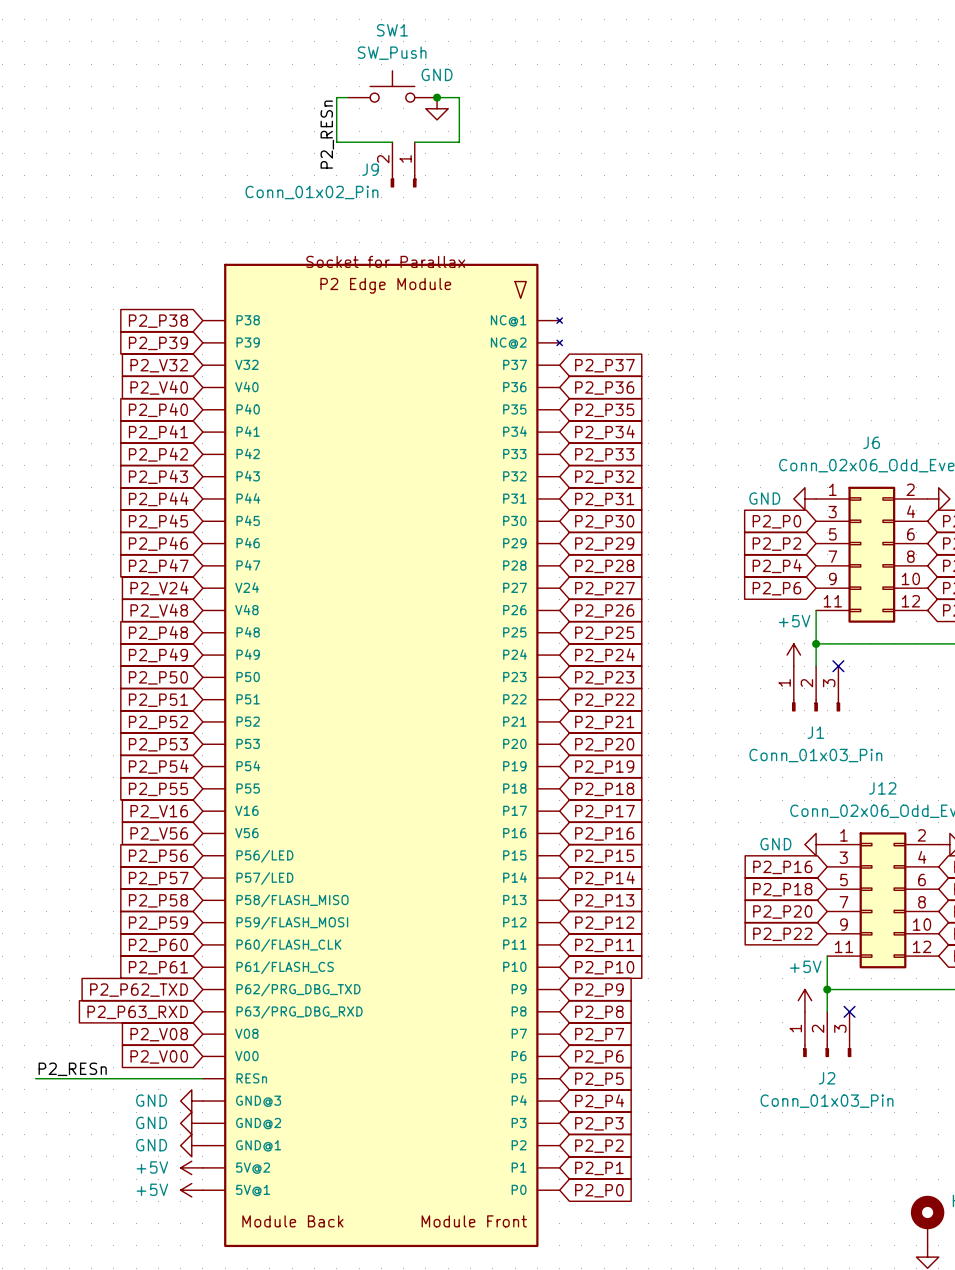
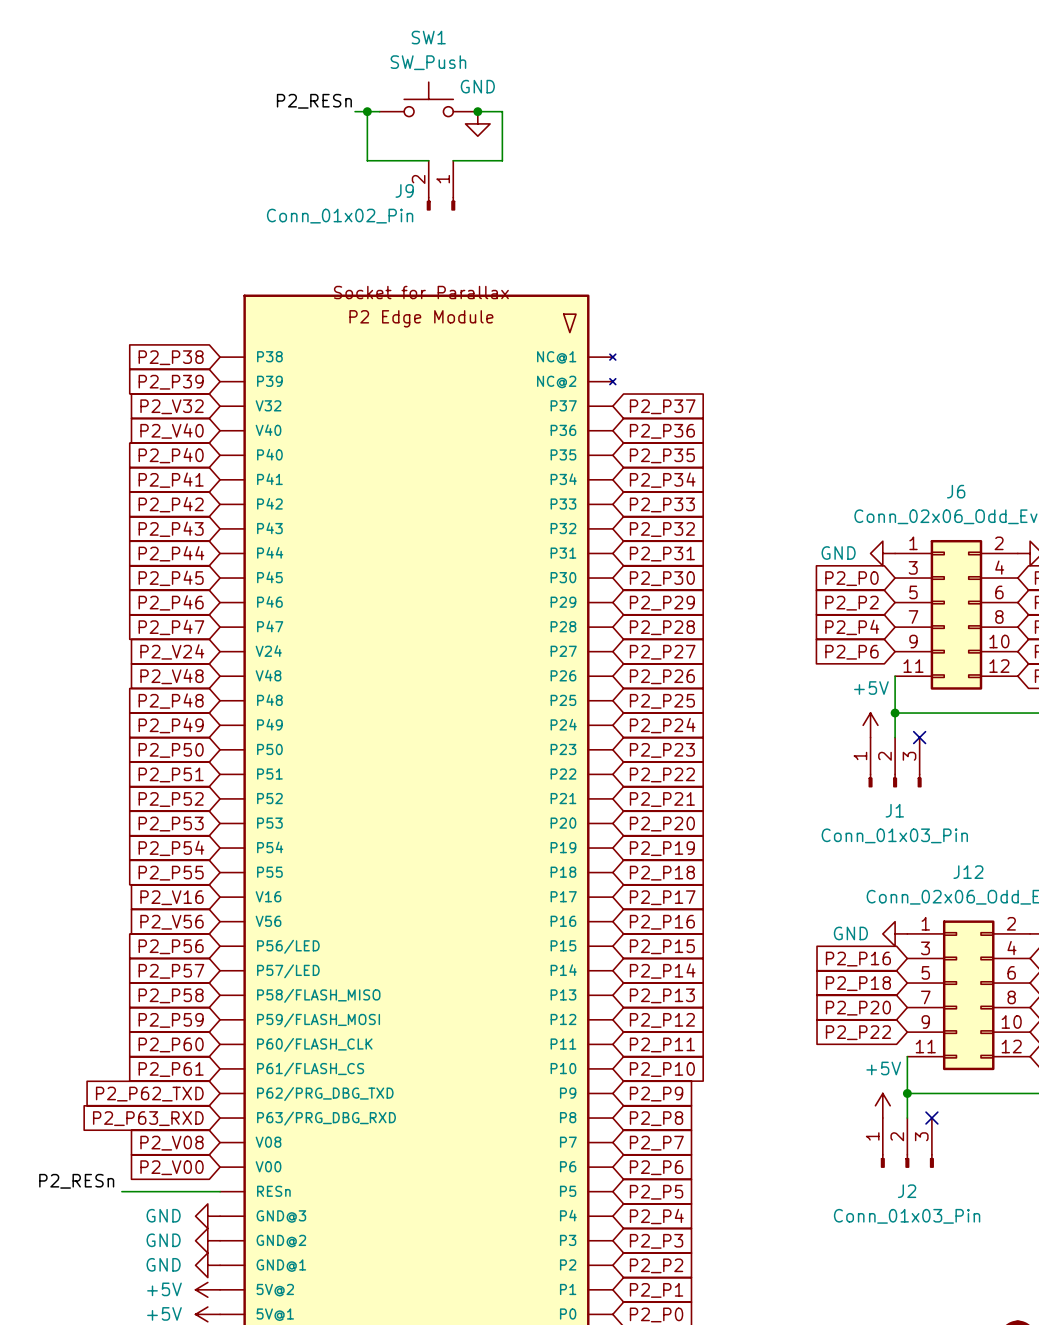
wire: none -> (355, 111) (367, 111)
junction: none -> (367, 111)
label rotation: 0° (327, 134) -> 90° clockwise (314, 101)
wire: (35, 1078) (113, 1078) -> none

